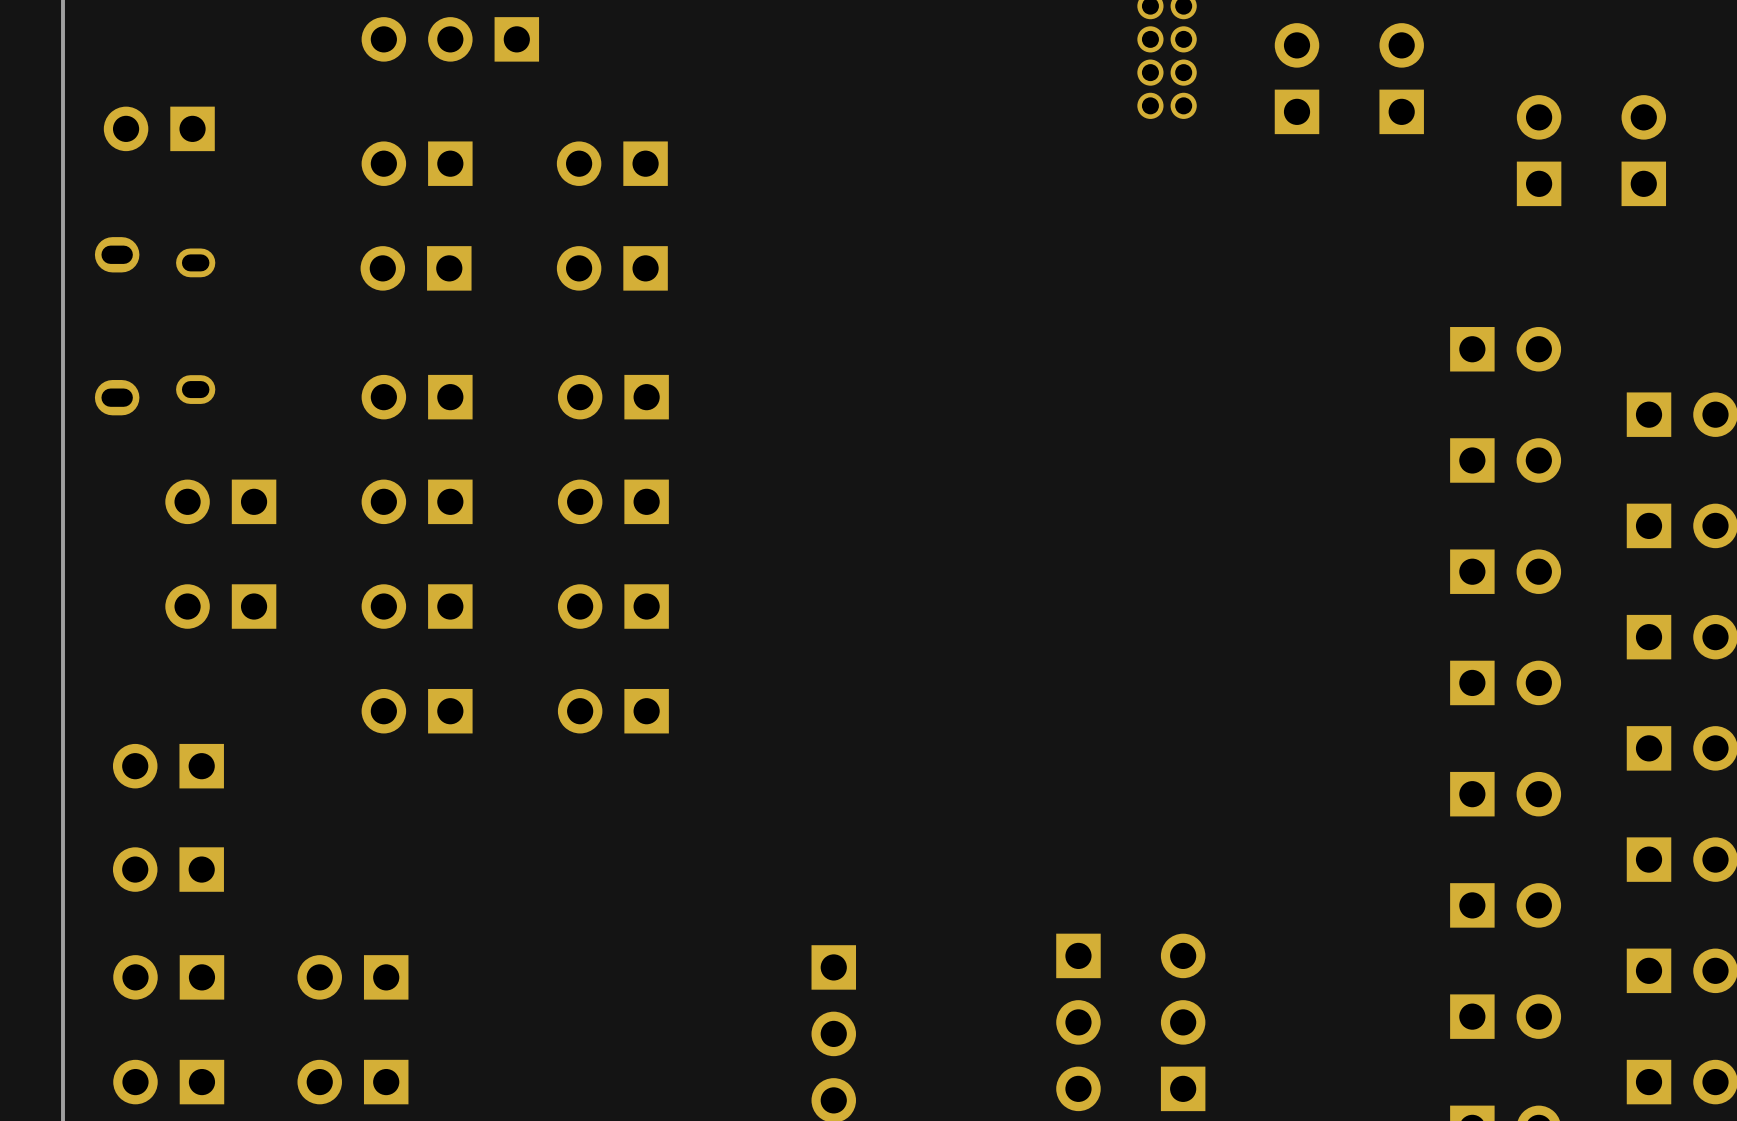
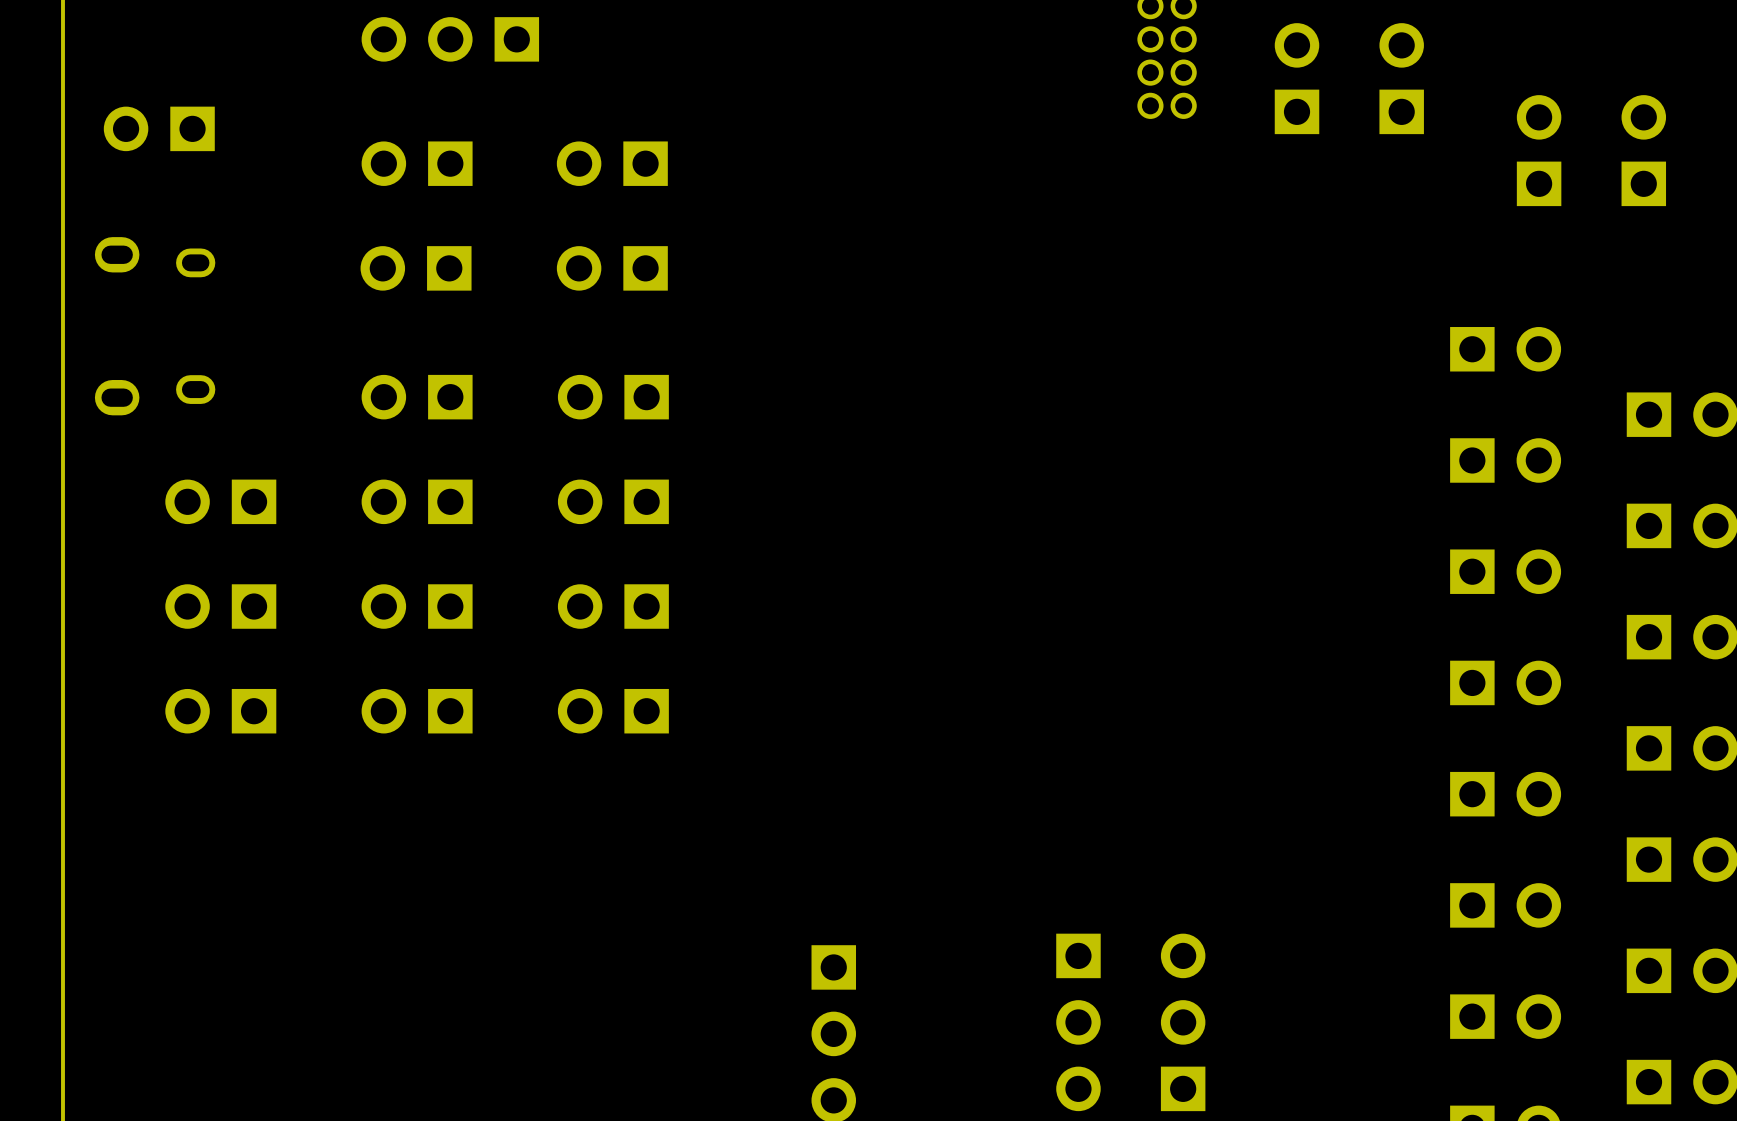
part position: (168, 766) -> (220, 711)
part: (168, 869) -> none
part: (168, 977) -> none
part: (352, 977) -> none
part: (168, 1082) -> none
part: (352, 1082) -> none

